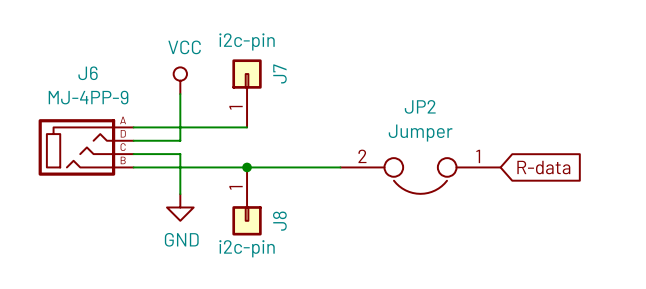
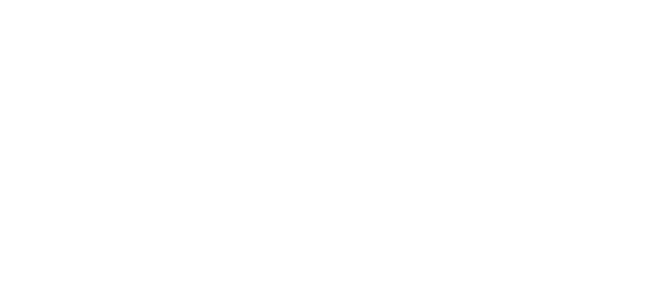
power symbol: VCC (180, 80) -> none
J7: i2c-pin (247, 93) -> none
wire: (180, 94) (180, 140) (133, 140) -> none
wire: (133, 127) (247, 127) -> none
J6: MJ-4PP-9 (86, 147) -> none
wire: (133, 154) (180, 154) (180, 194) -> none
wire: (133, 167) (340, 167) -> none
junction: (247, 167) -> none
global label: R-data (543, 167) -> none
JP2: Jumper (420, 175) -> none
J8: i2c-pin (247, 201) -> none
power symbol: GND (180, 207) -> none

